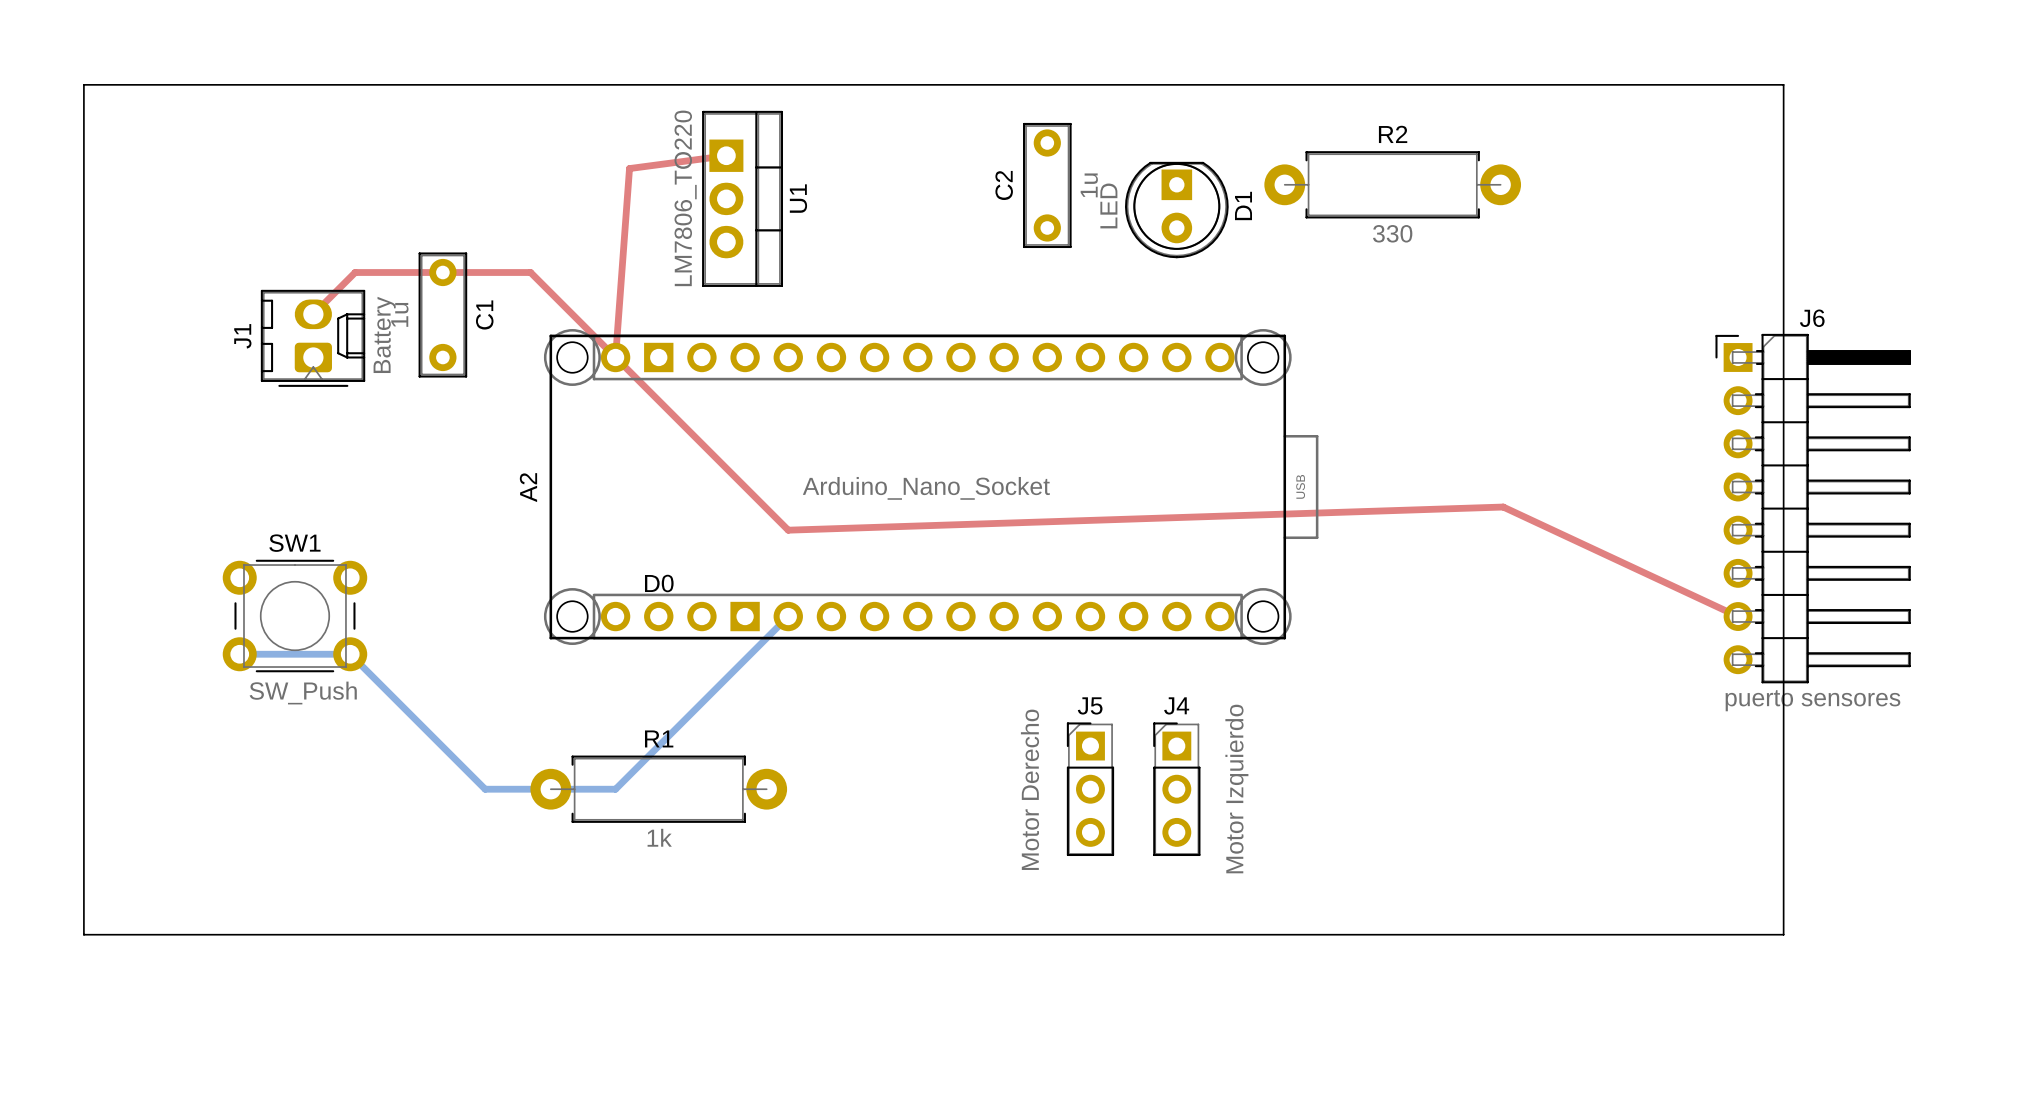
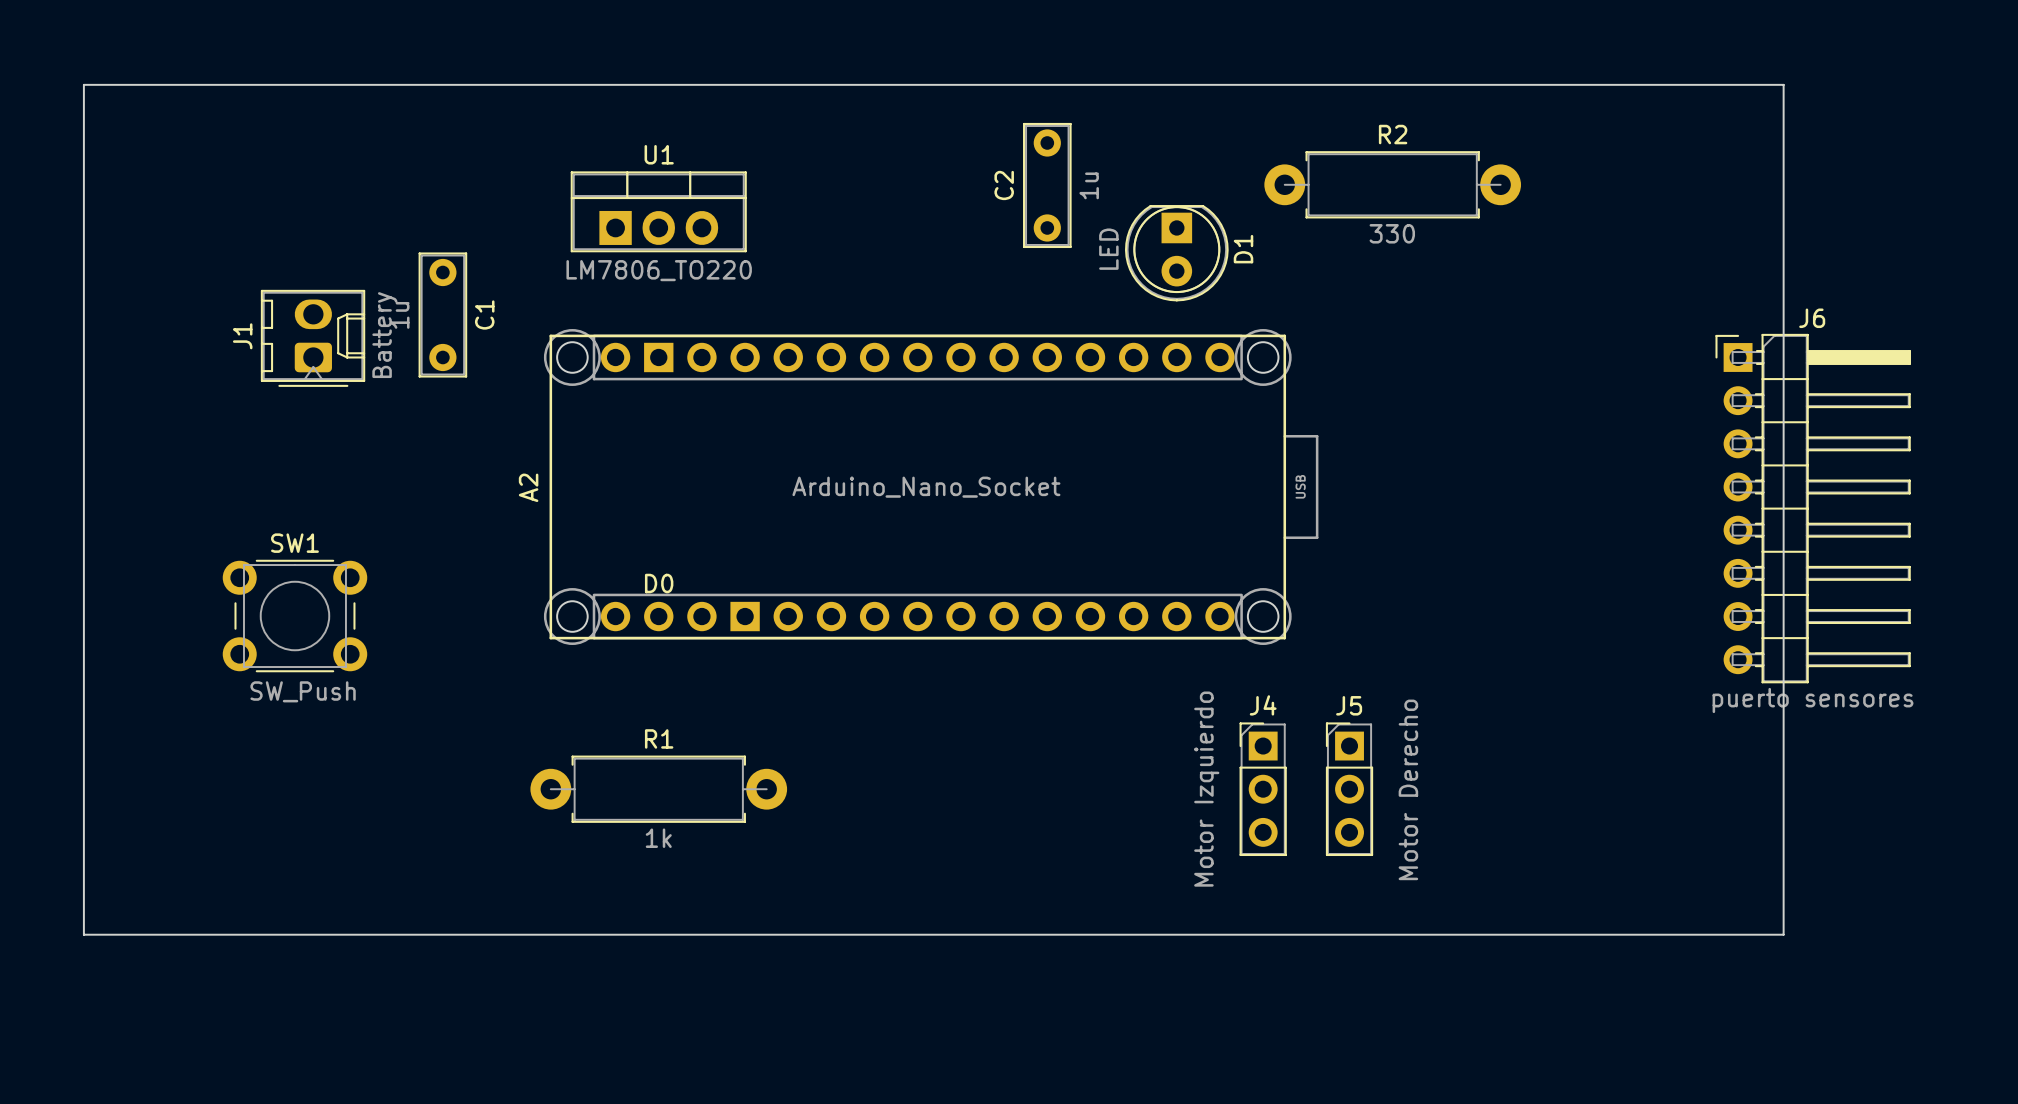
top track: (726, 155) (629, 168) (615, 357) -> none
U1 rotation: 0° (742, 198) -> 90° counterclockwise (658, 211)
D1 position: (1176, 210) -> (1176, 253)
top track: (313, 314) (355, 272) (530, 272) (788, 530) (1503, 507) (1738, 616) -> none
bottom track: (788, 616) (615, 789) (485, 789) (350, 654) (239, 654) -> none
J5 value position: Motor Derecho (1029, 789) -> Motor Derecho (1408, 789)
J5 position: (1090, 789) -> (1349, 789)
J4 position: (1176, 789) -> (1263, 789)
J4 value position: Motor Izquierdo (1236, 789) -> Motor Izquierdo (1206, 789)

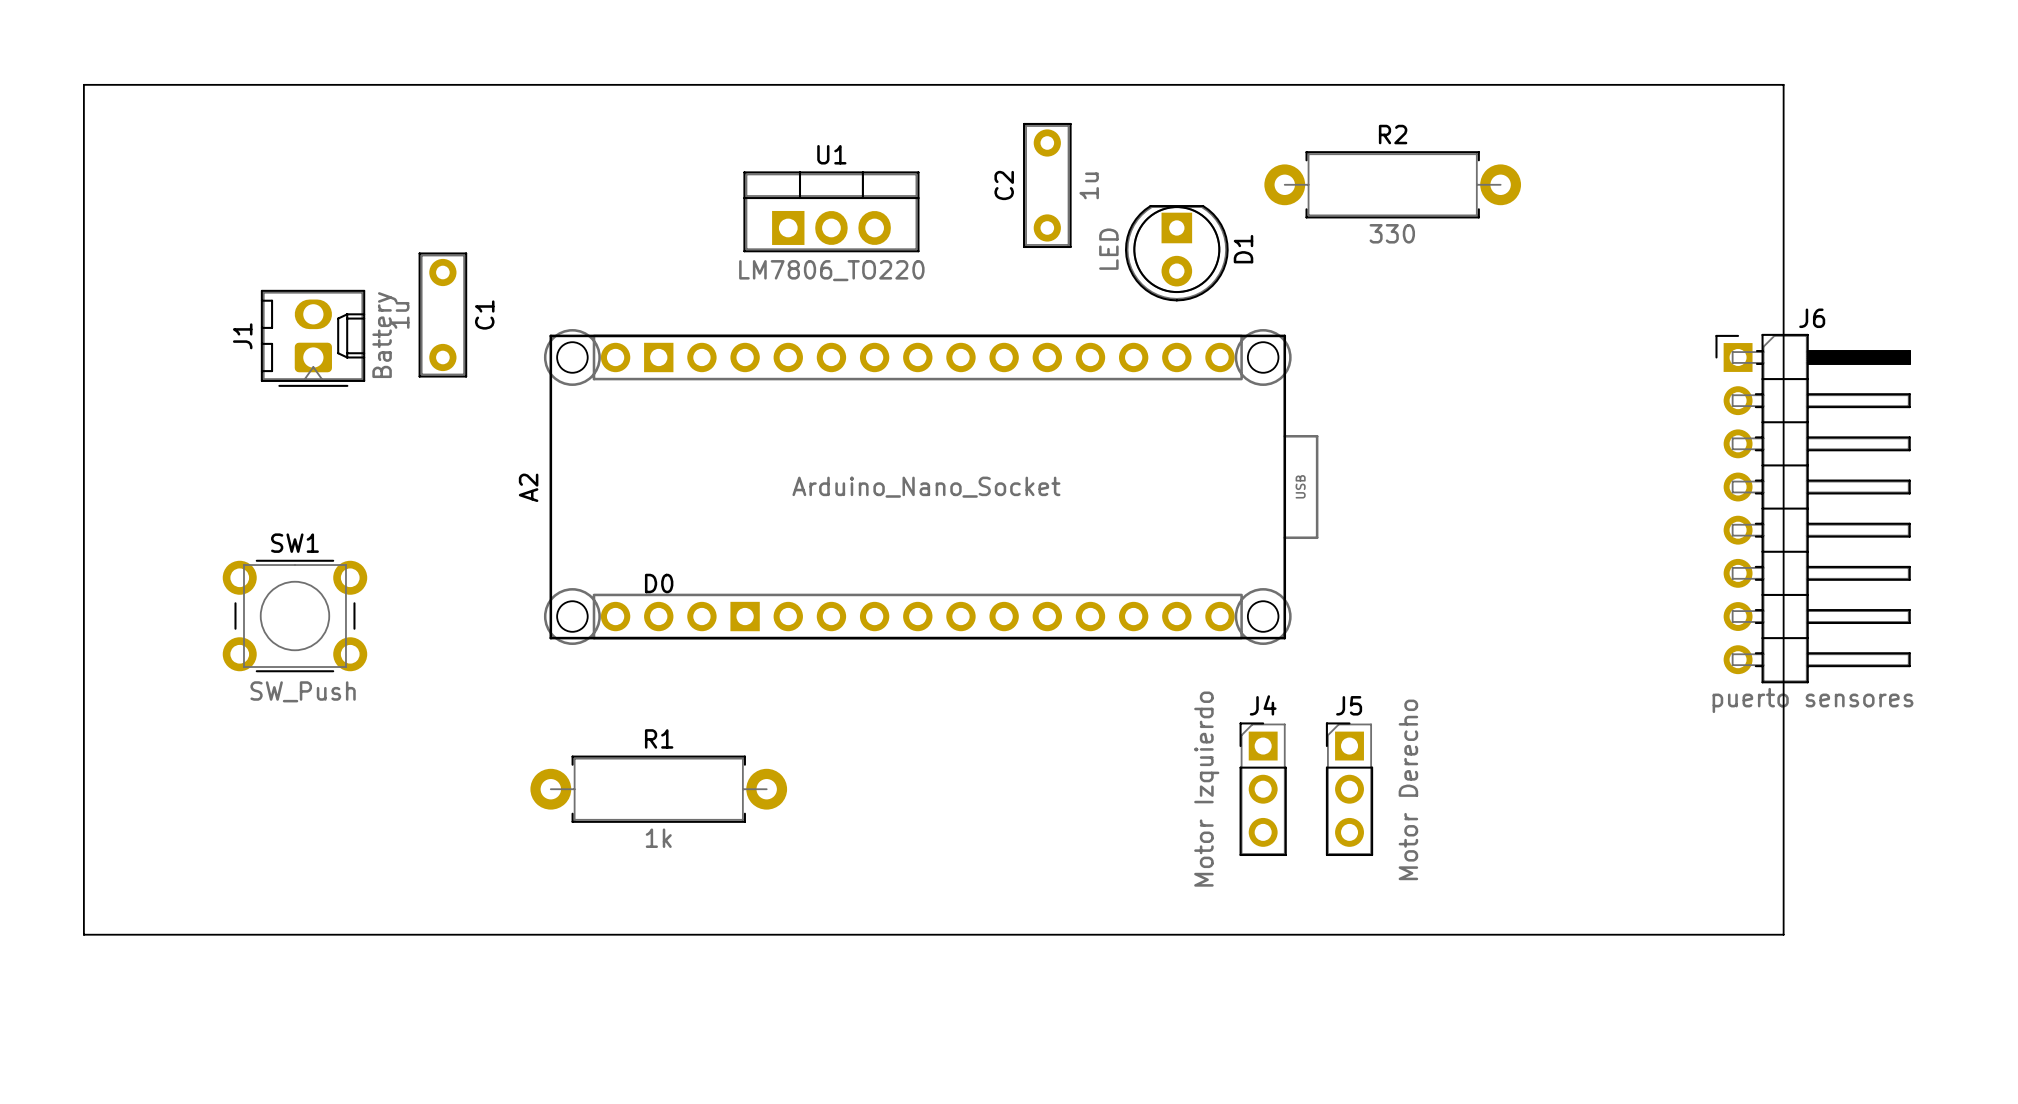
U1 position: (658, 211) -> (831, 211)

